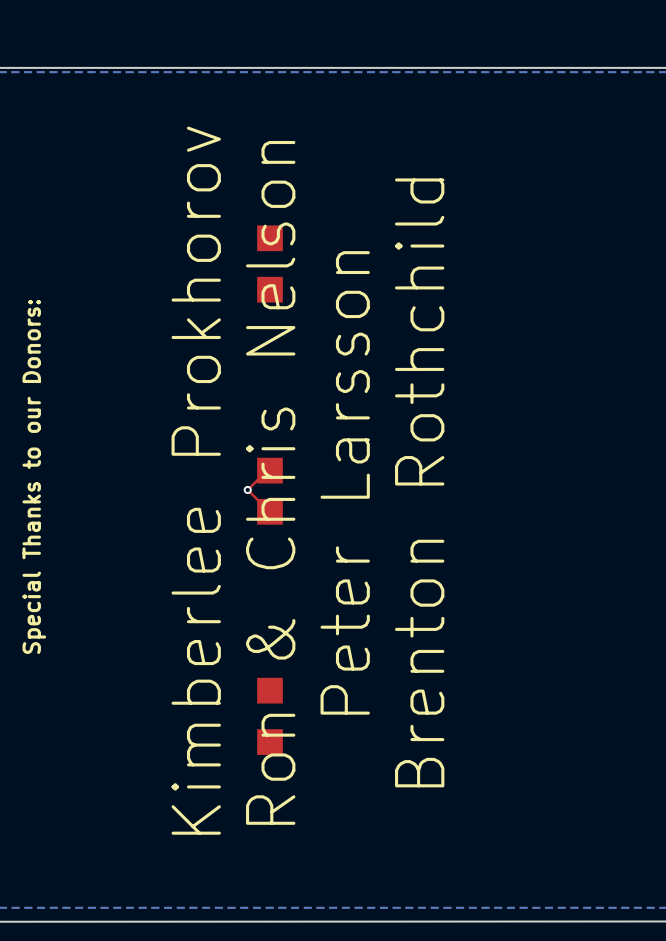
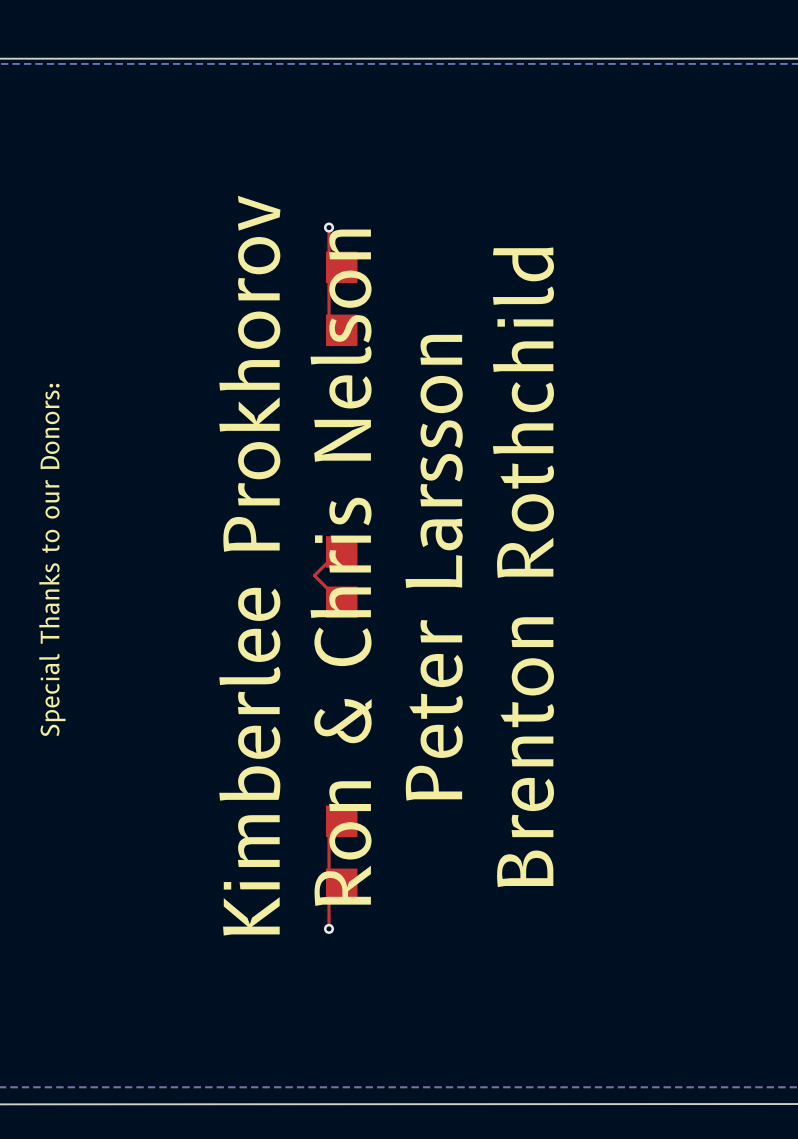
top track: none -> (329, 227) (329, 334)
via: none -> (329, 227)
via: (247, 489) -> none
top track: none -> (329, 825) (329, 928)
via: none -> (329, 928)

